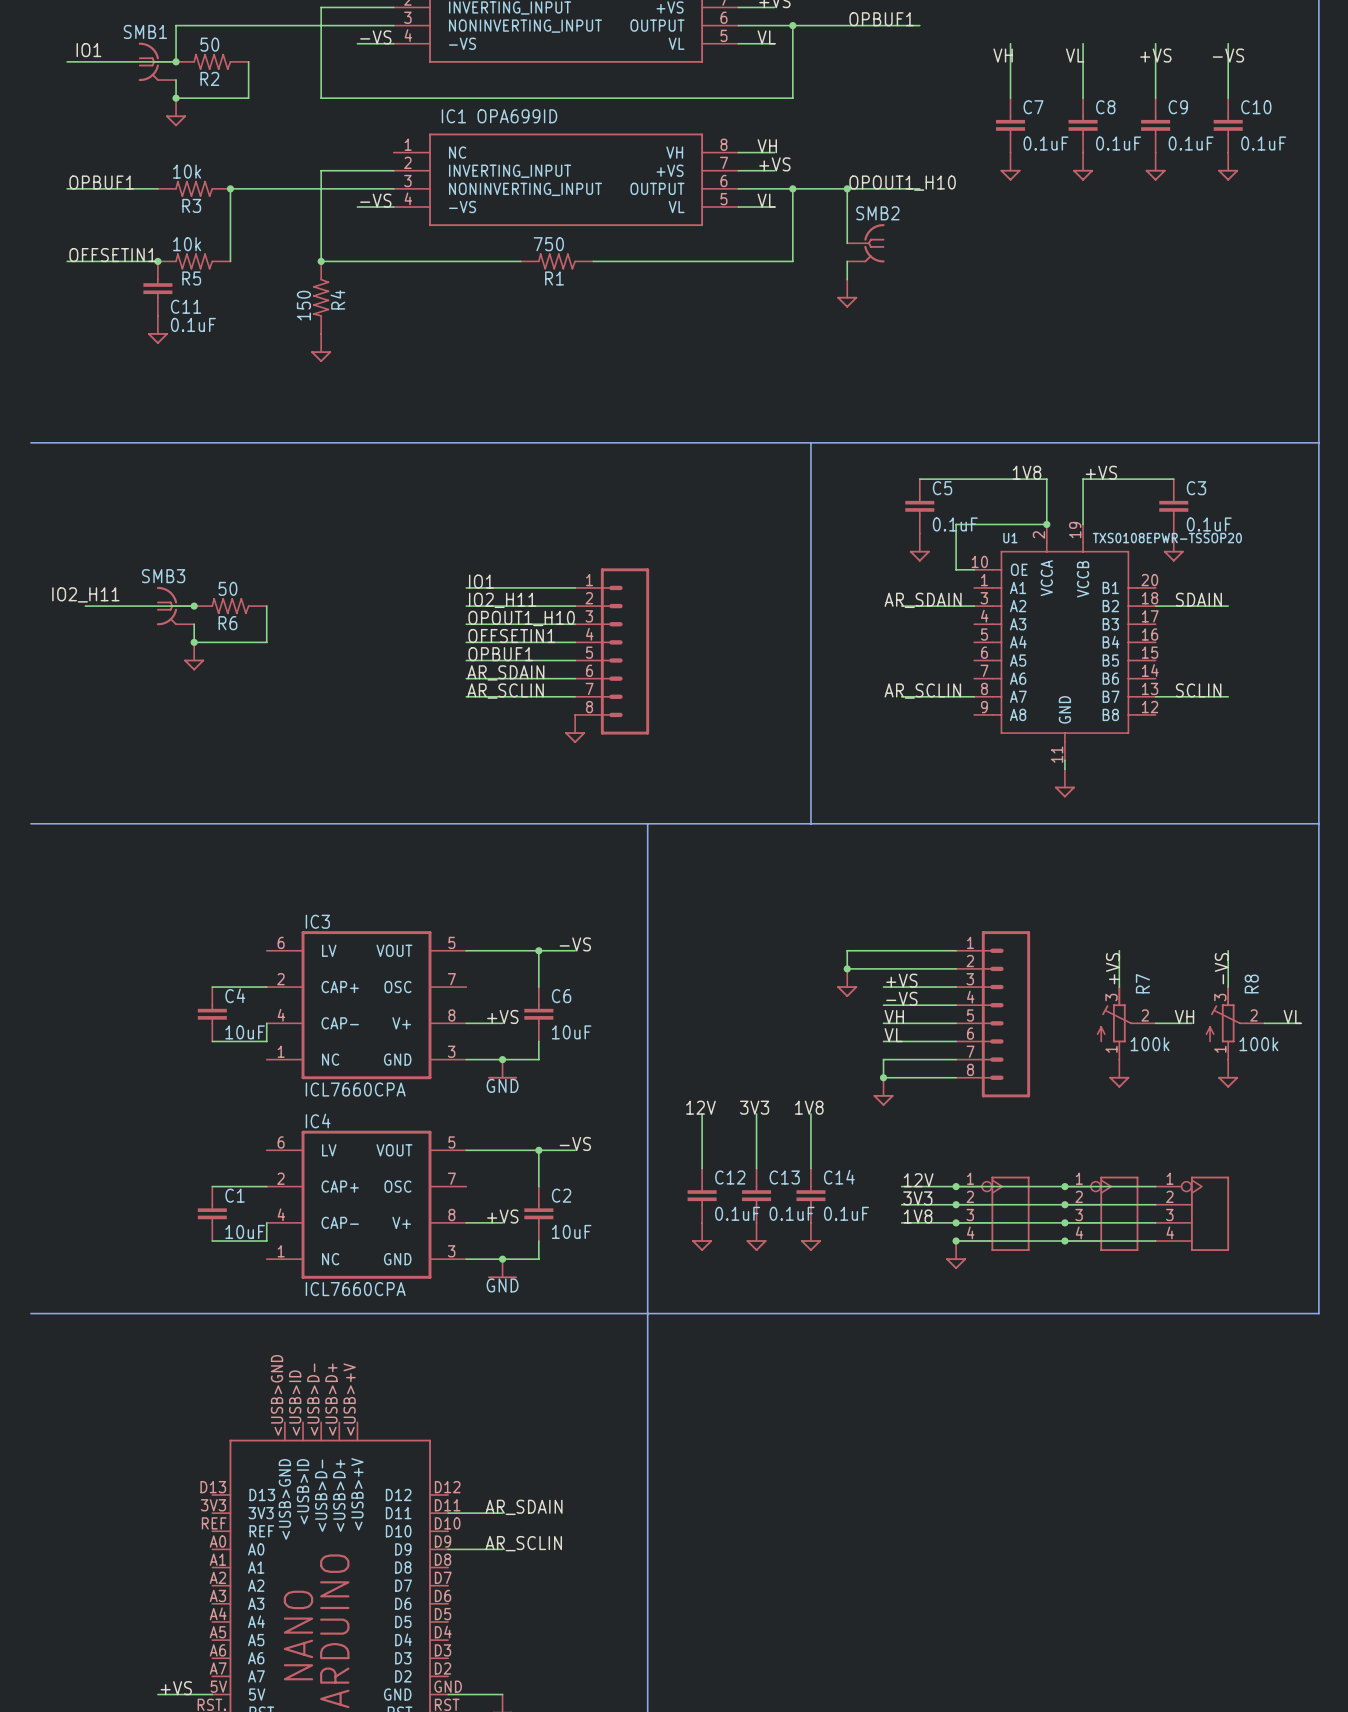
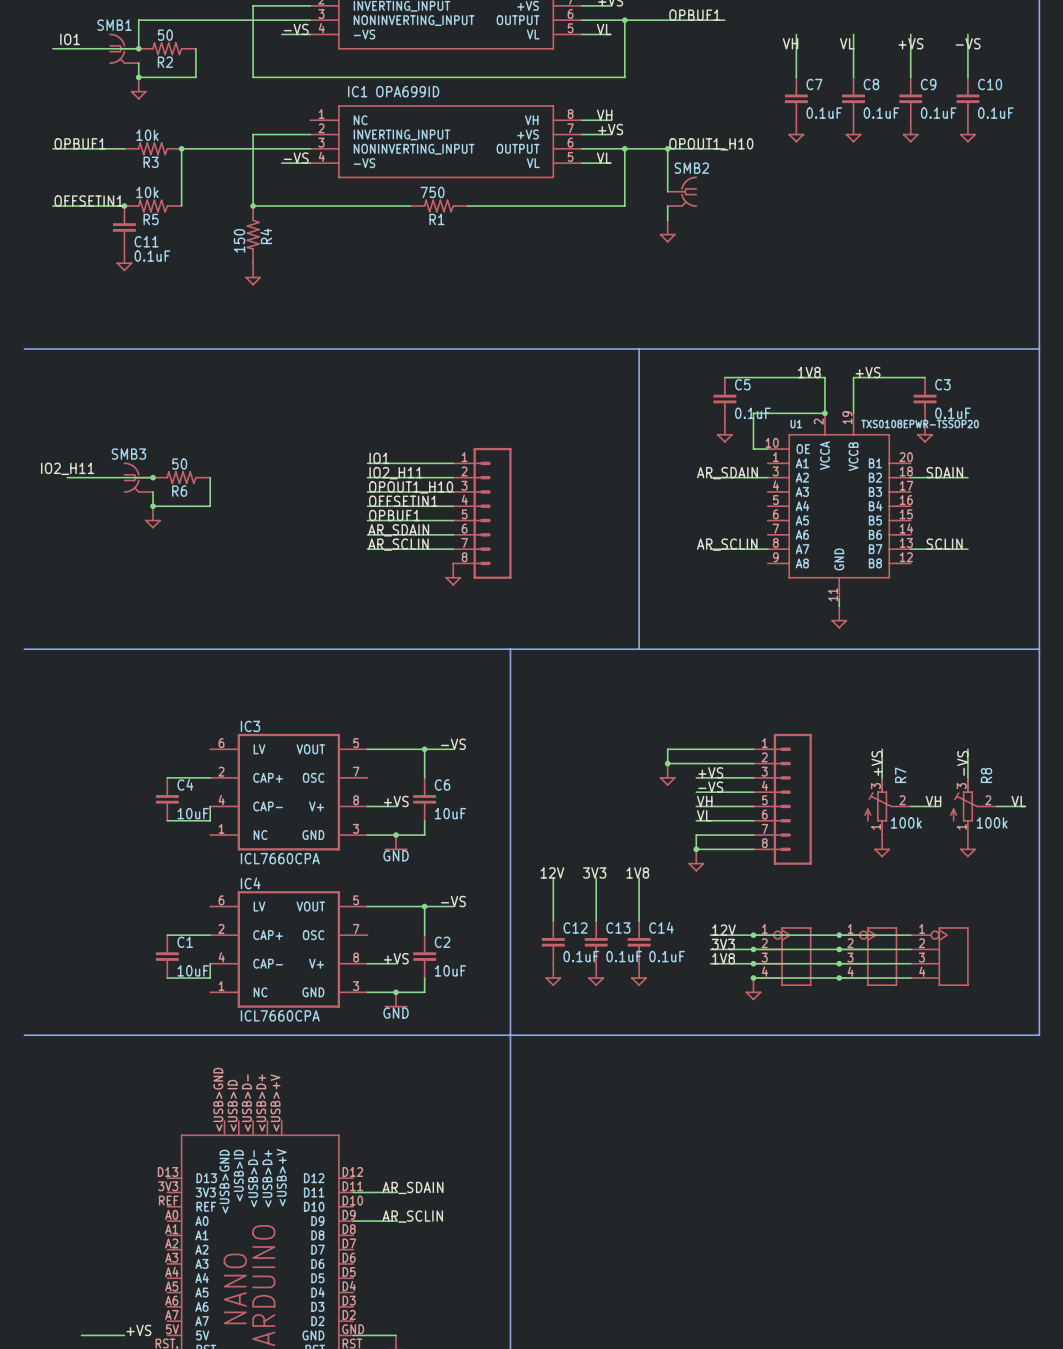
wire: (157, 1694) (212, 1694) -> (124, 1335) (81, 1335)

